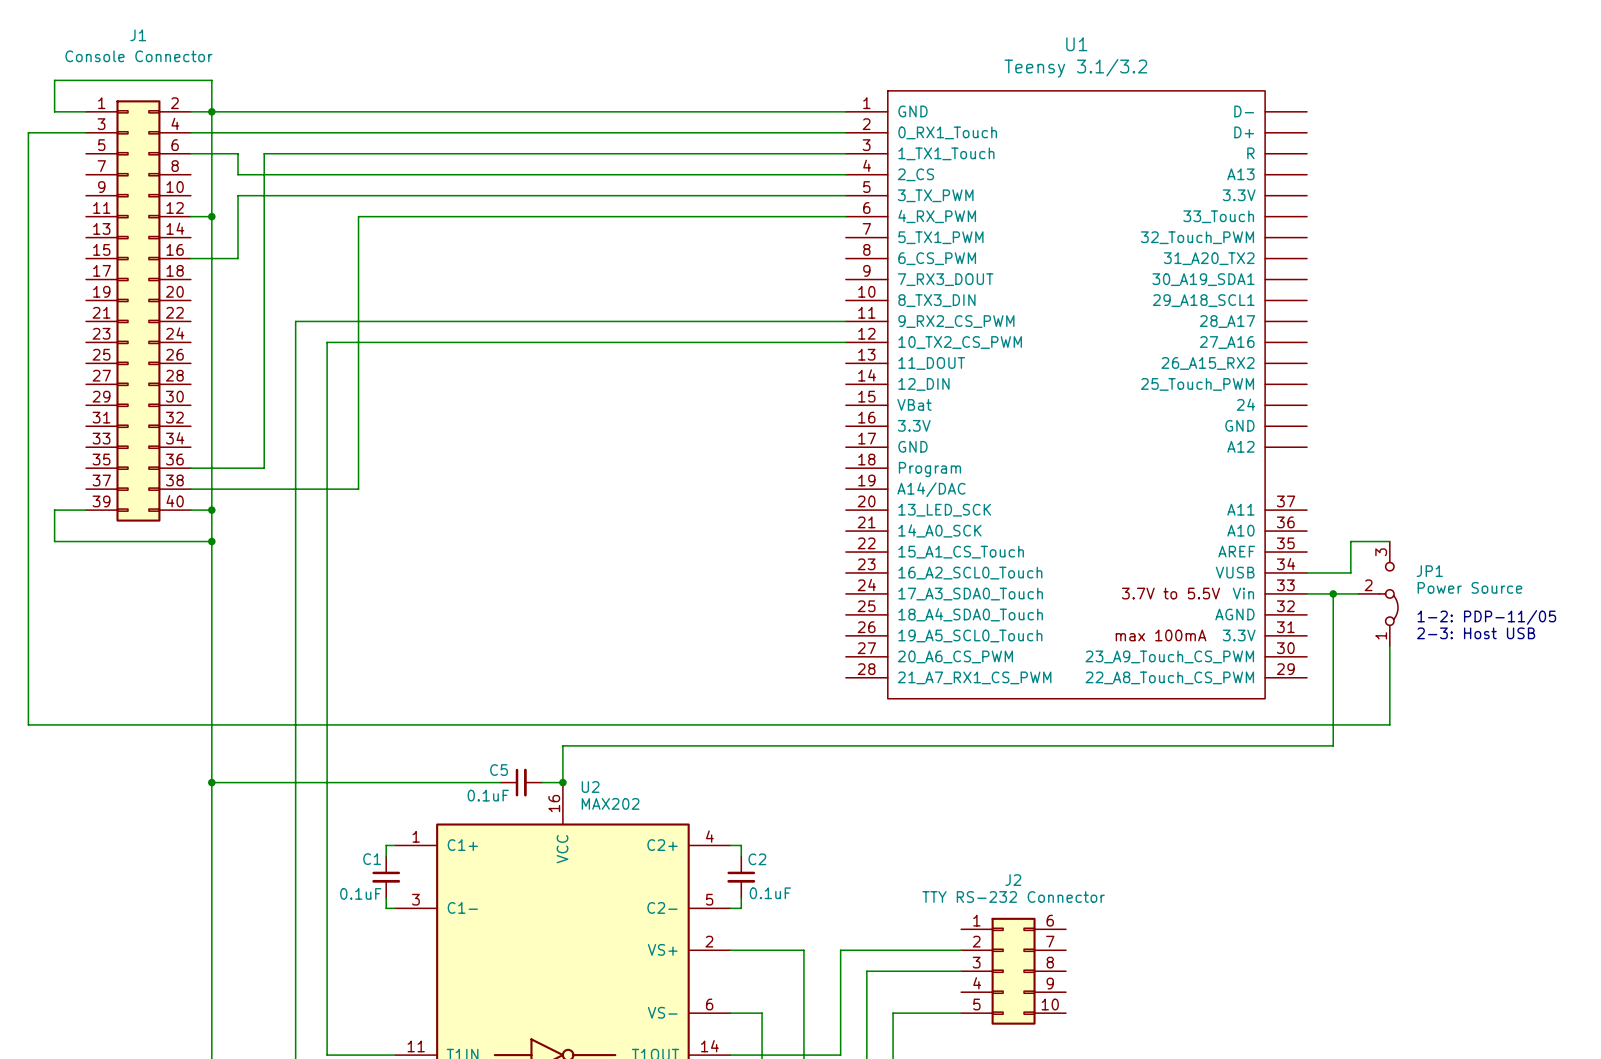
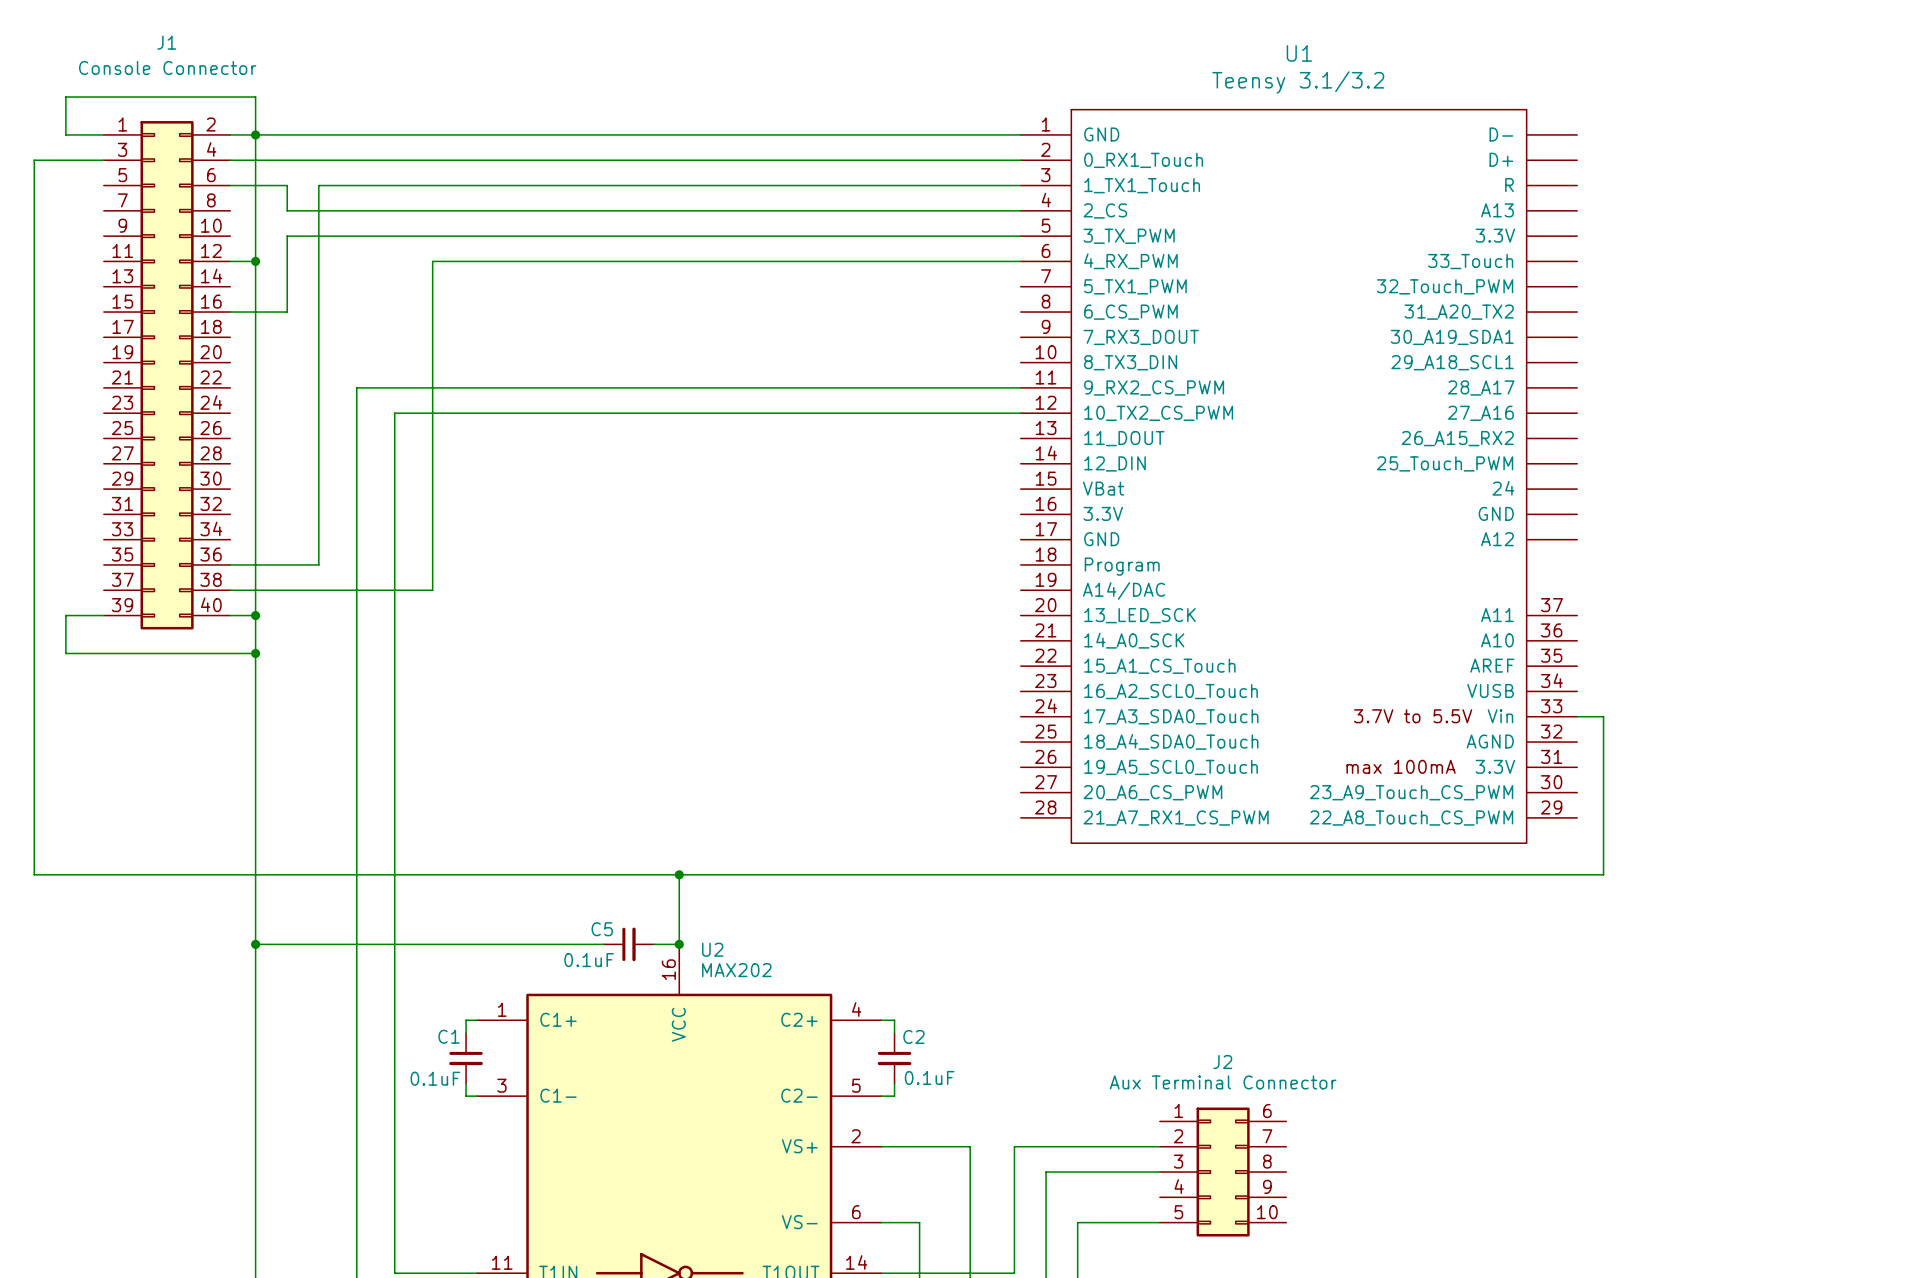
wire: (1389, 541) (1350, 541) (1350, 572) (1307, 572) -> none
wire: (1328, 593) (1358, 593) -> none
wire: (1333, 593) (1333, 745) (562, 745) -> (679, 874) (679, 900)
junction: (1333, 593) -> none
JP1: Power Source (1378, 593) -> none
text: 1-2: PDP-11/05 (1486, 617) -> none
text: 2-3: Host USB (1476, 633) -> none
wire: (1389, 646) (1389, 724) (1328, 724) -> (1603, 716) (1603, 874)
junction: none -> (679, 874)
J2 value: TTY RS-232 Connector (1013, 896) -> Aux Terminal Connector (1223, 1082)

